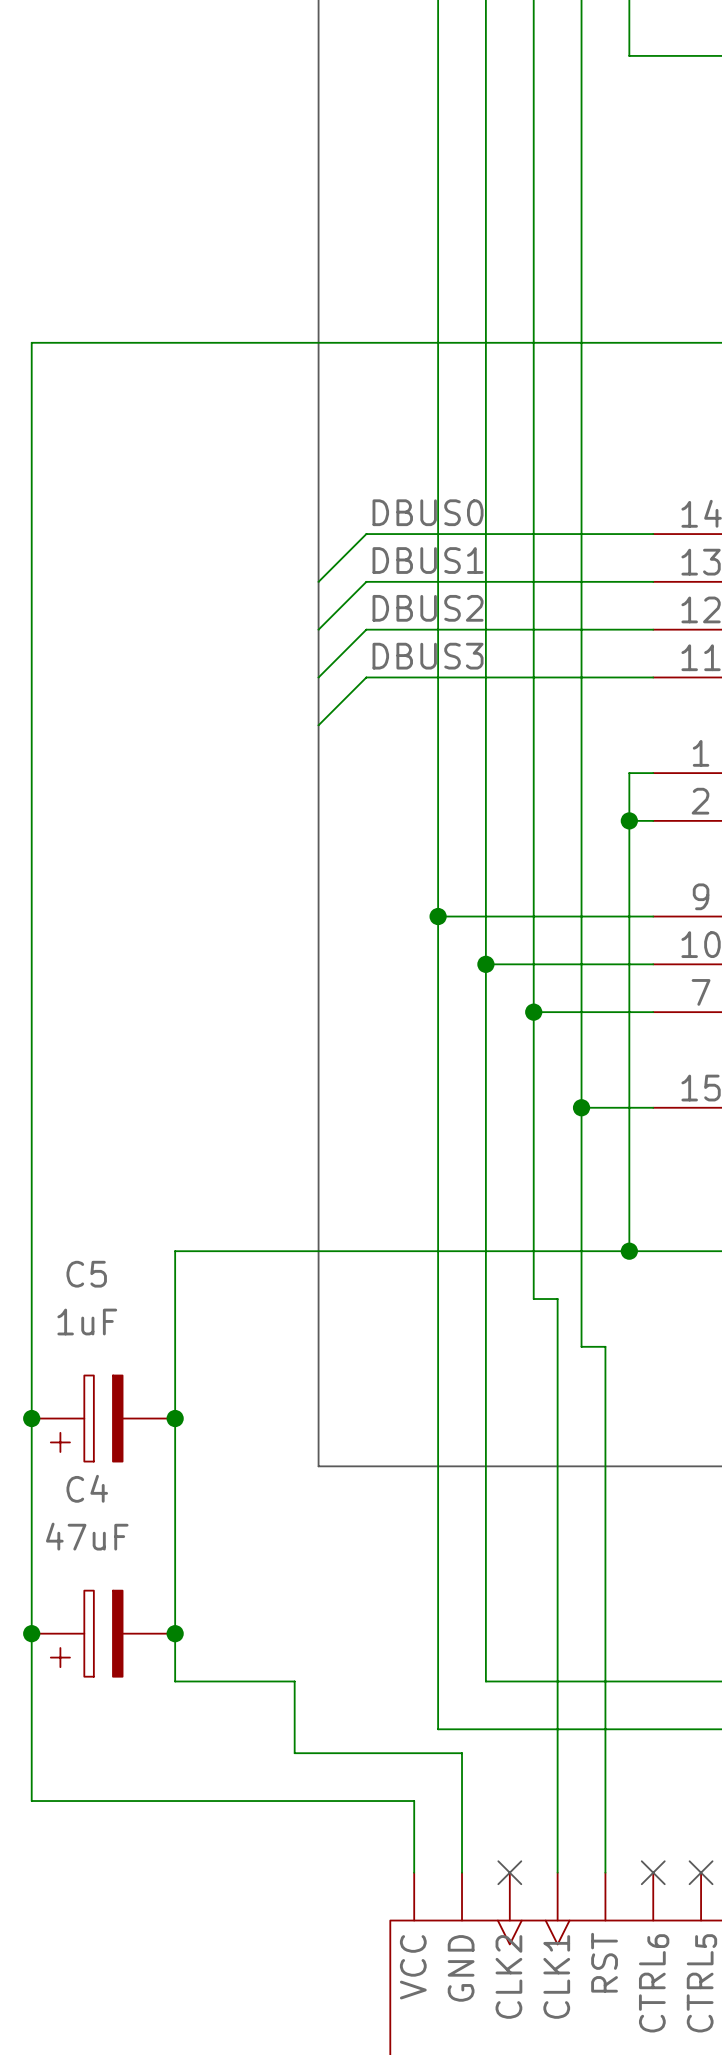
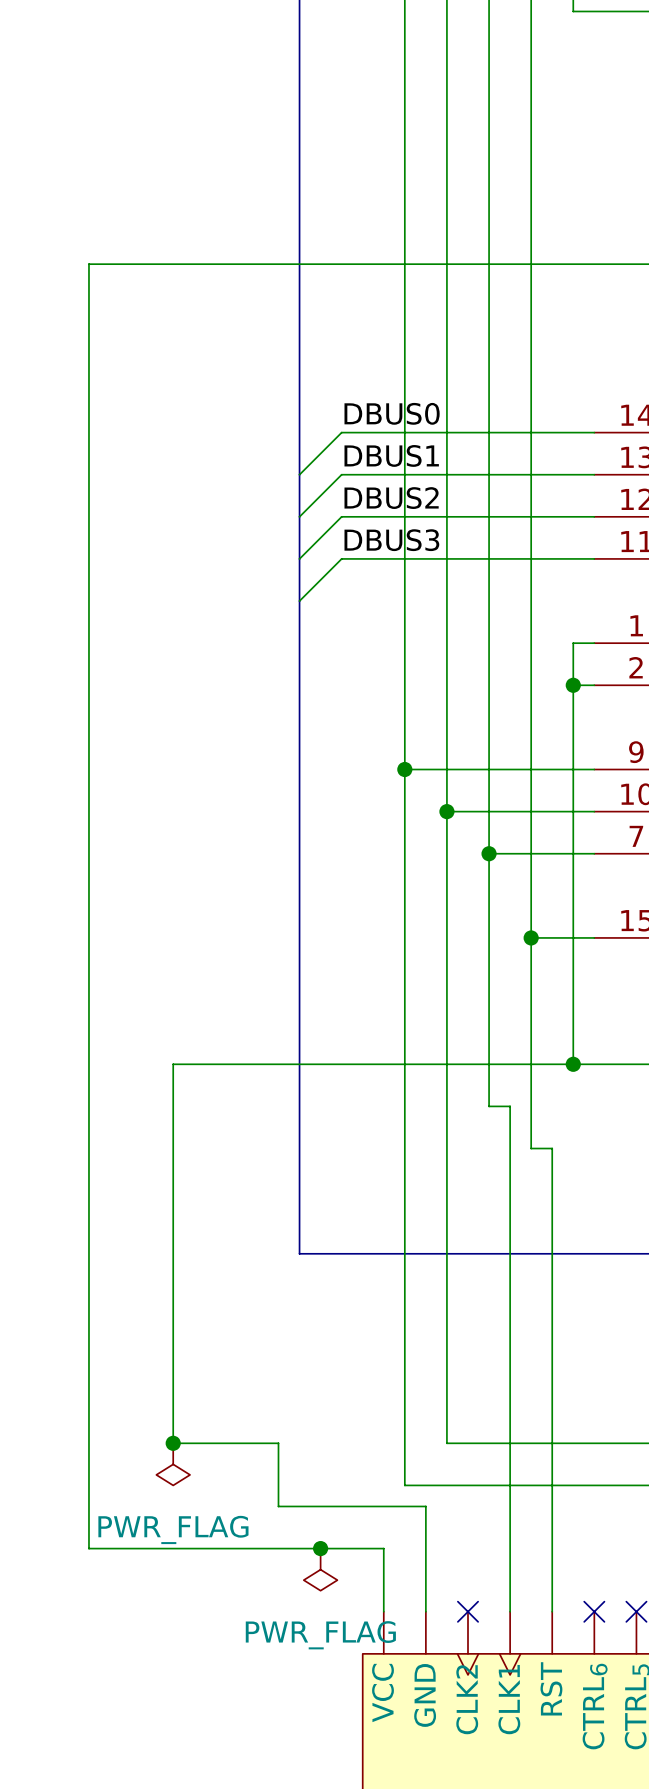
wire: (79, 342) (31, 342) (31, 1801) (79, 1801) -> (88, 264) (88, 1548)
junction: (31, 1418) -> none
C5: 1uF (103, 1418) -> none
junction: (175, 1418) -> none
junction: (31, 1633) -> none
C4: 47uF (103, 1633) -> none
junction position: (175, 1633) -> (173, 1443)
power symbol: none -> PWR_FLAG (173, 1464)
junction: none -> (320, 1548)
power symbol: none -> PWR_FLAG (320, 1569)

